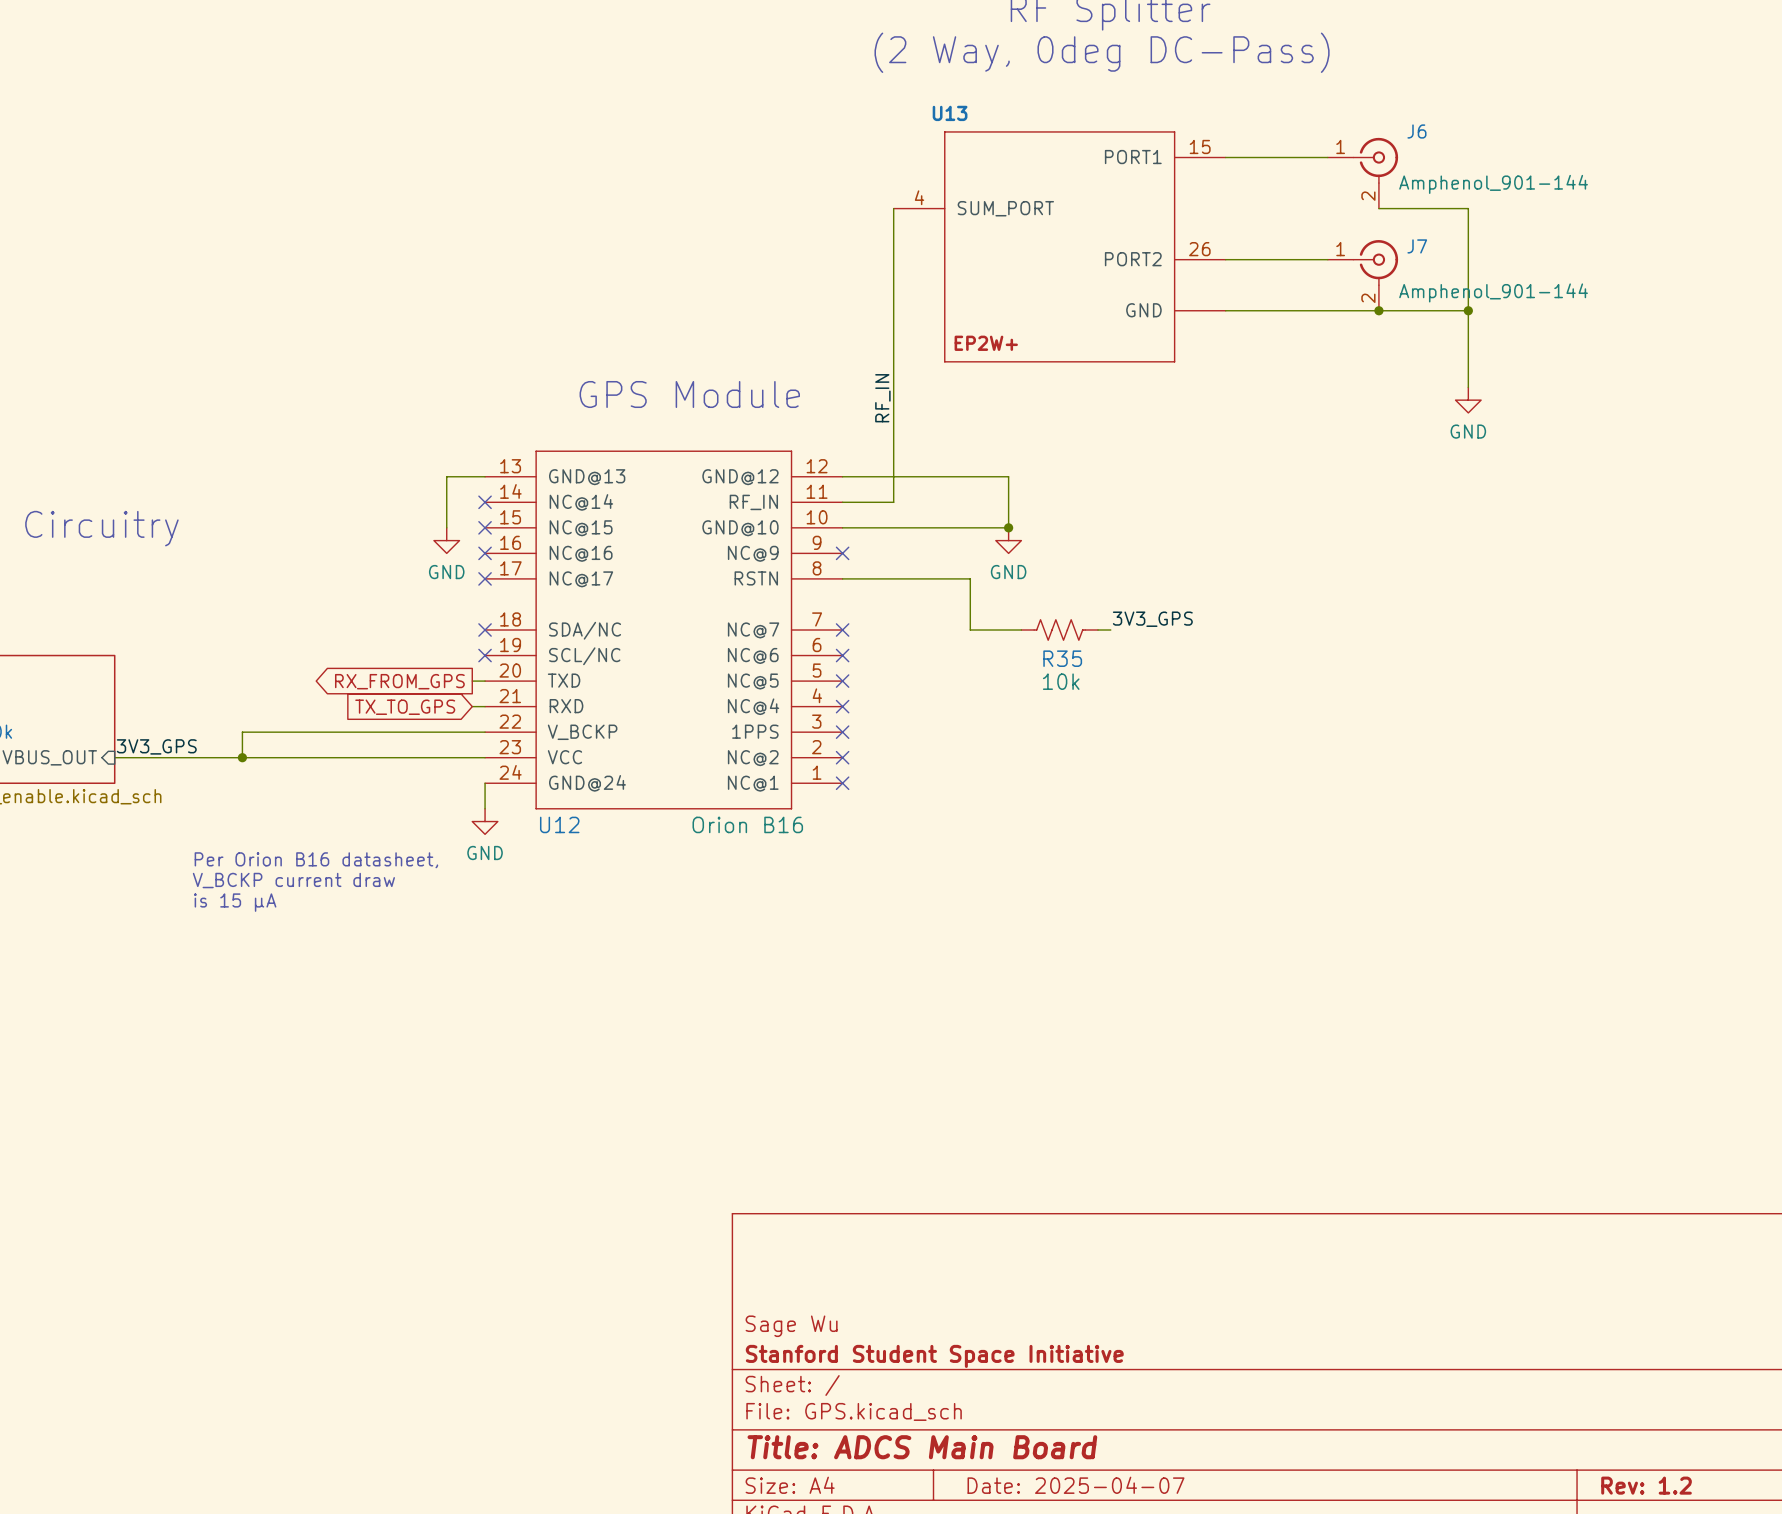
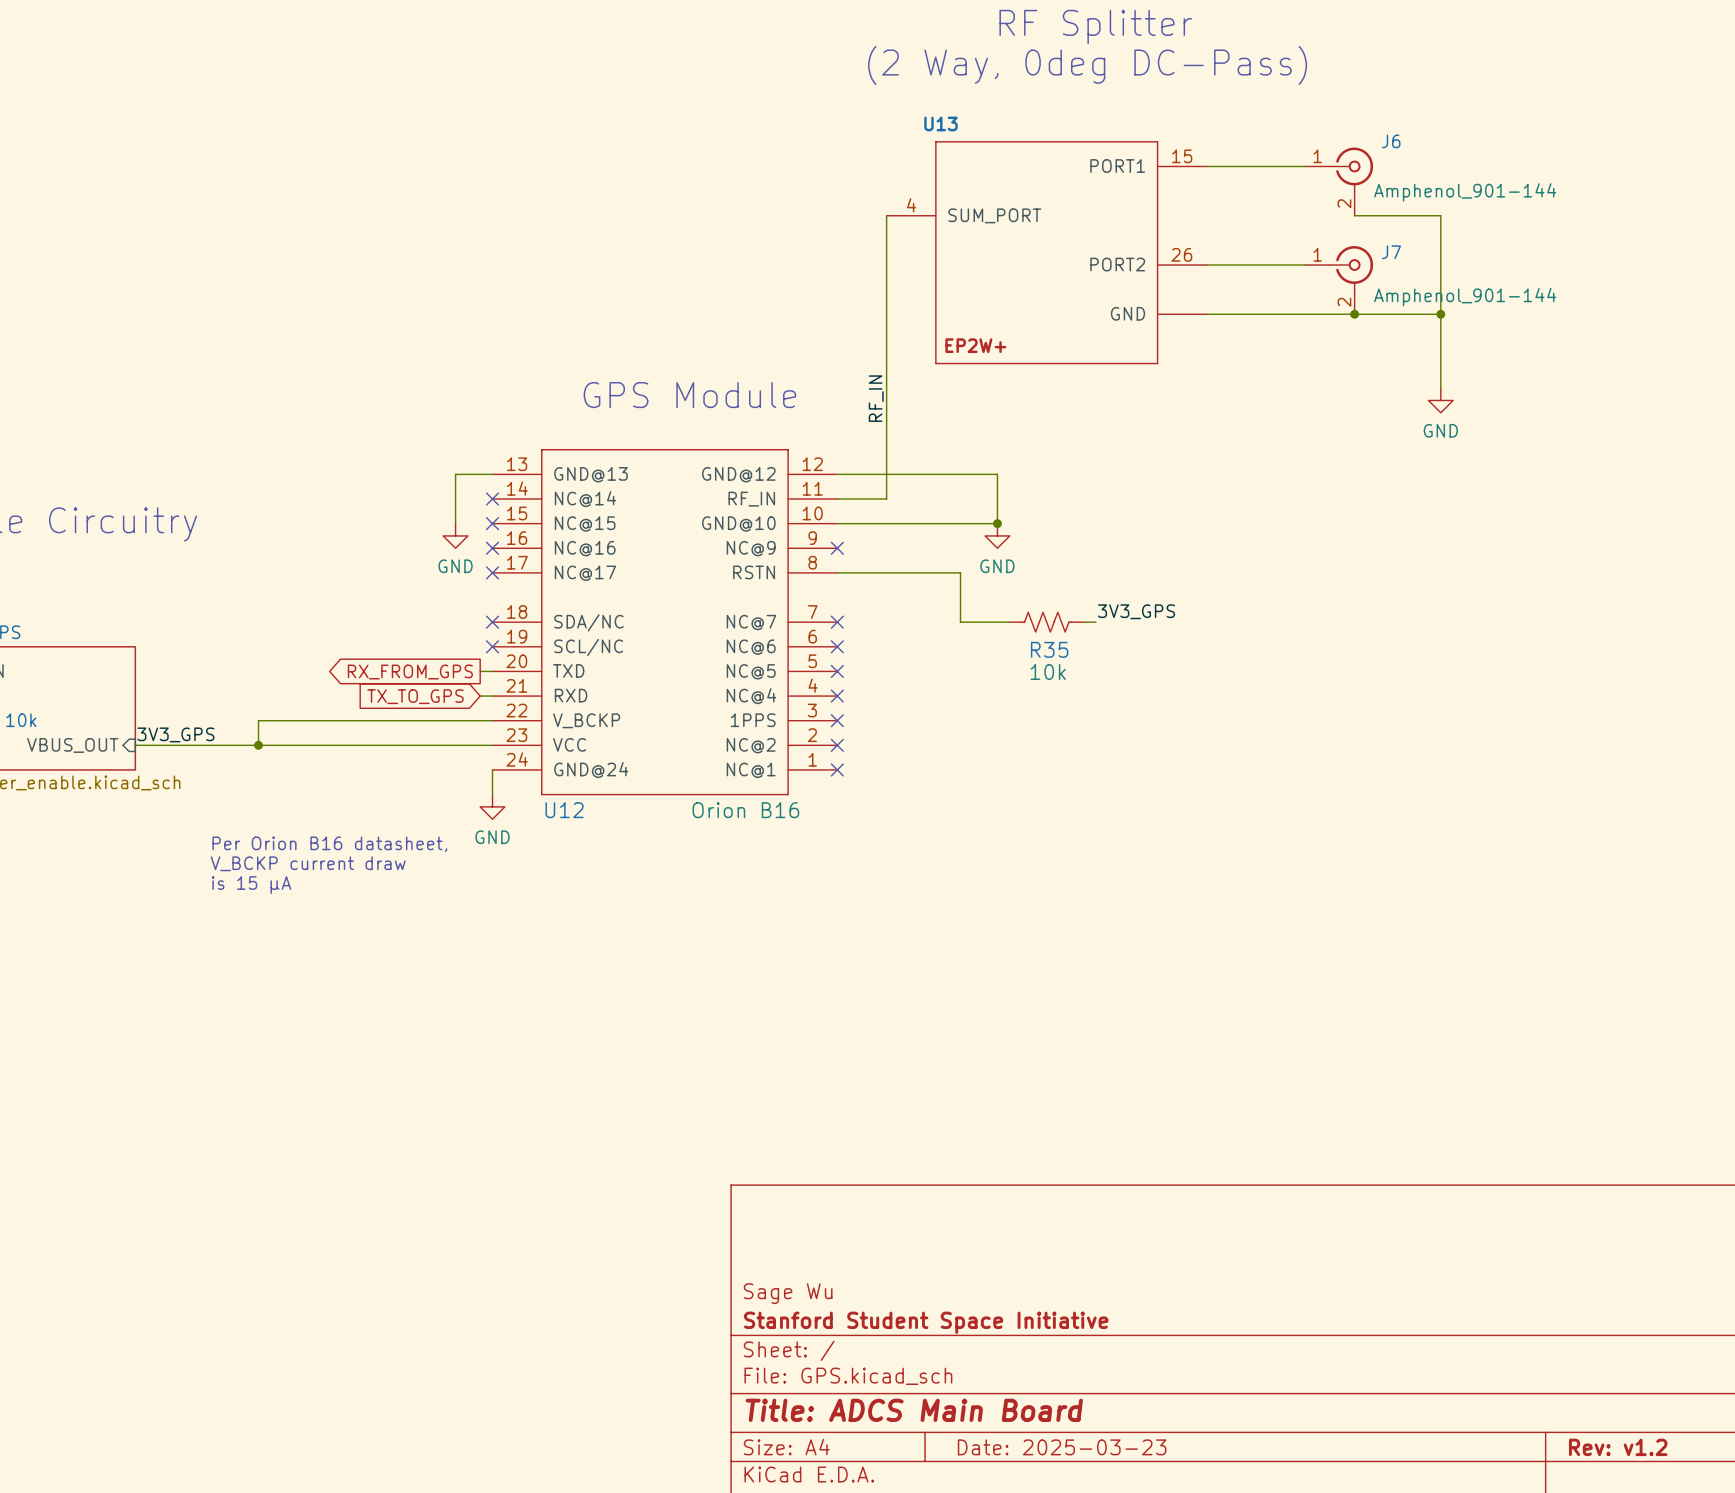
title block: Date: 2025-04-07 (1076, 1485) -> Date: 2025-03-23 (1062, 1447)
title block: Rev: 1.2 (1646, 1485) -> Rev: v1.2 (1618, 1447)

